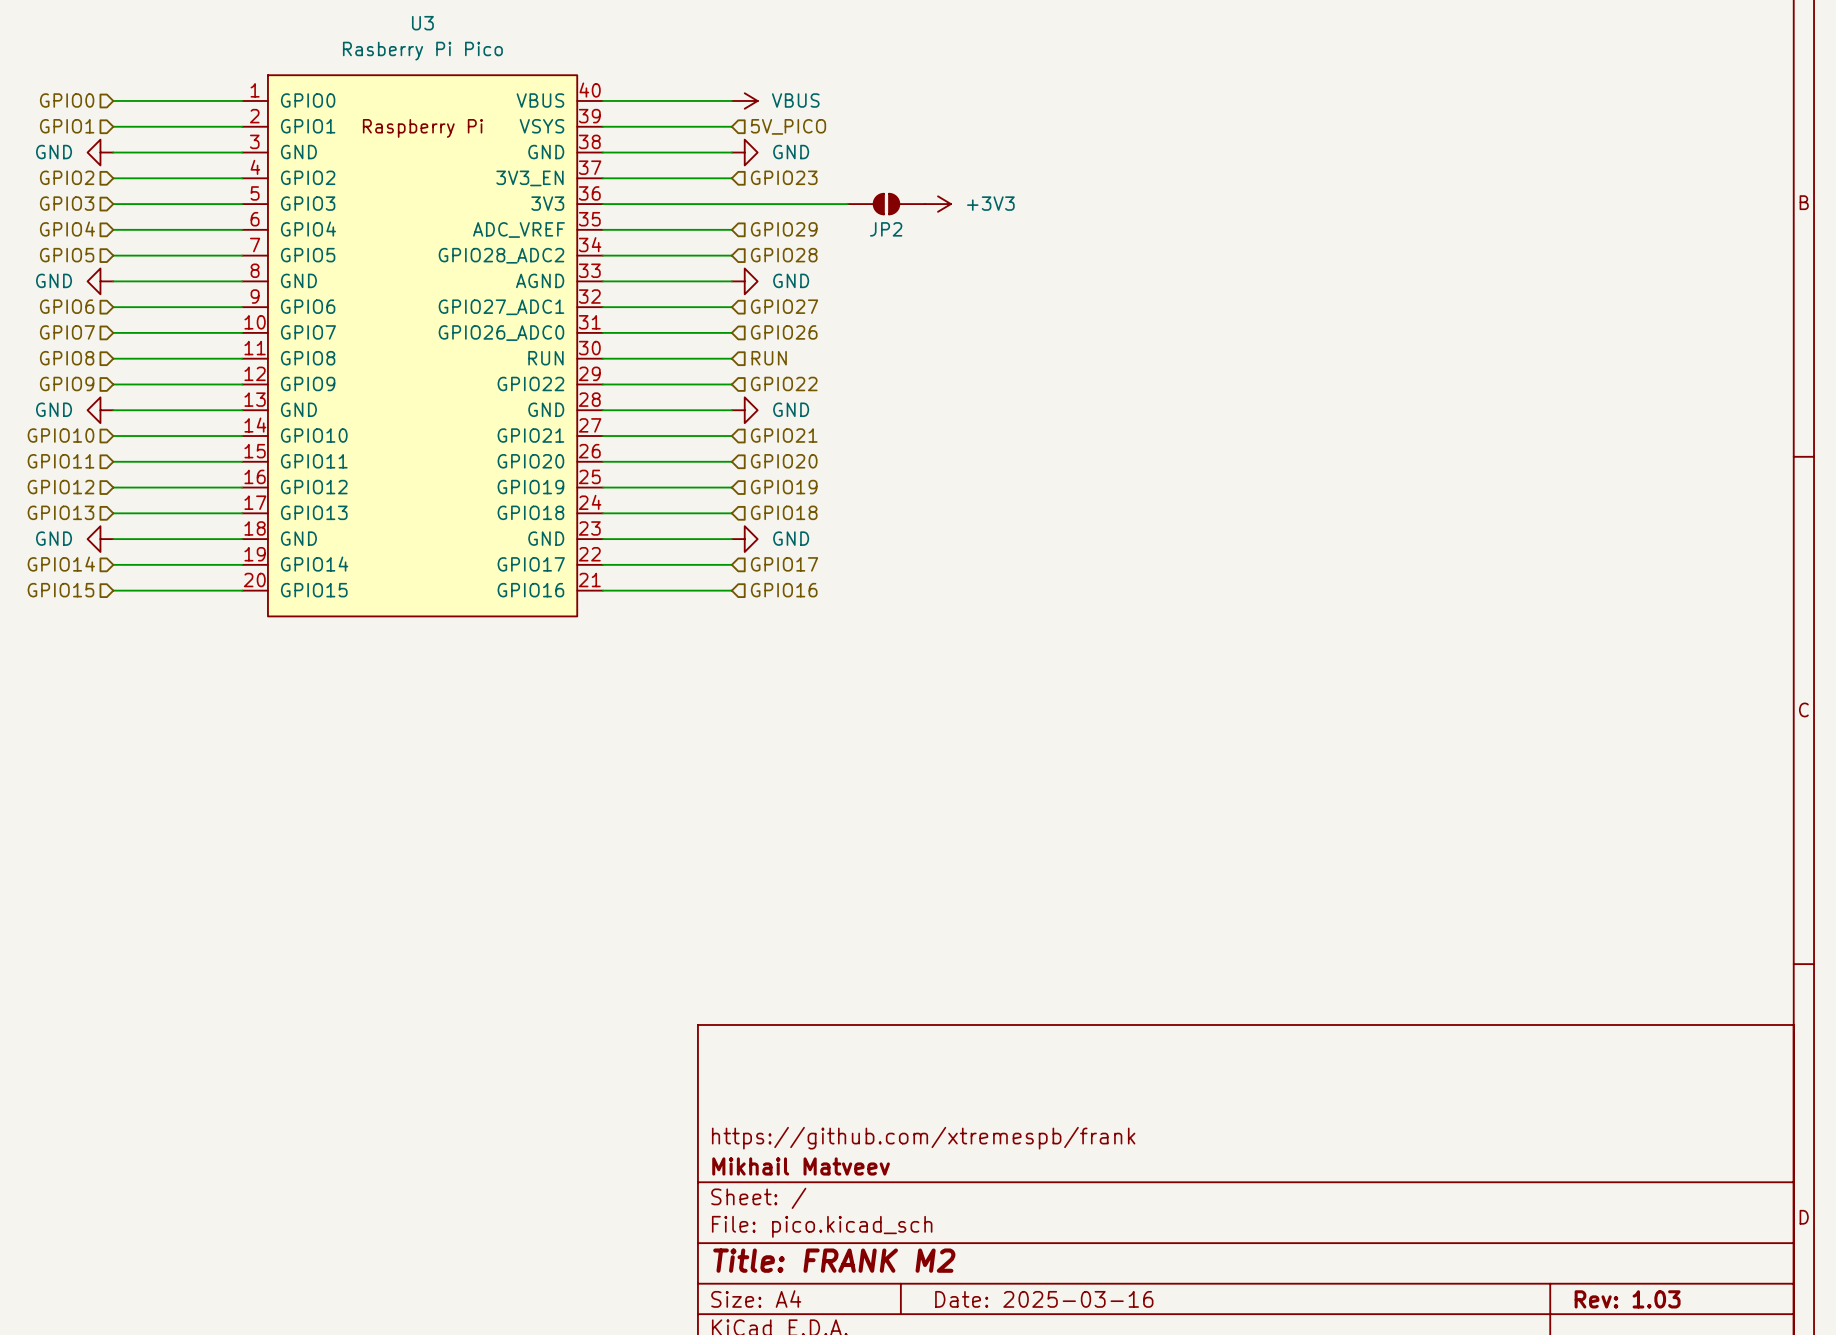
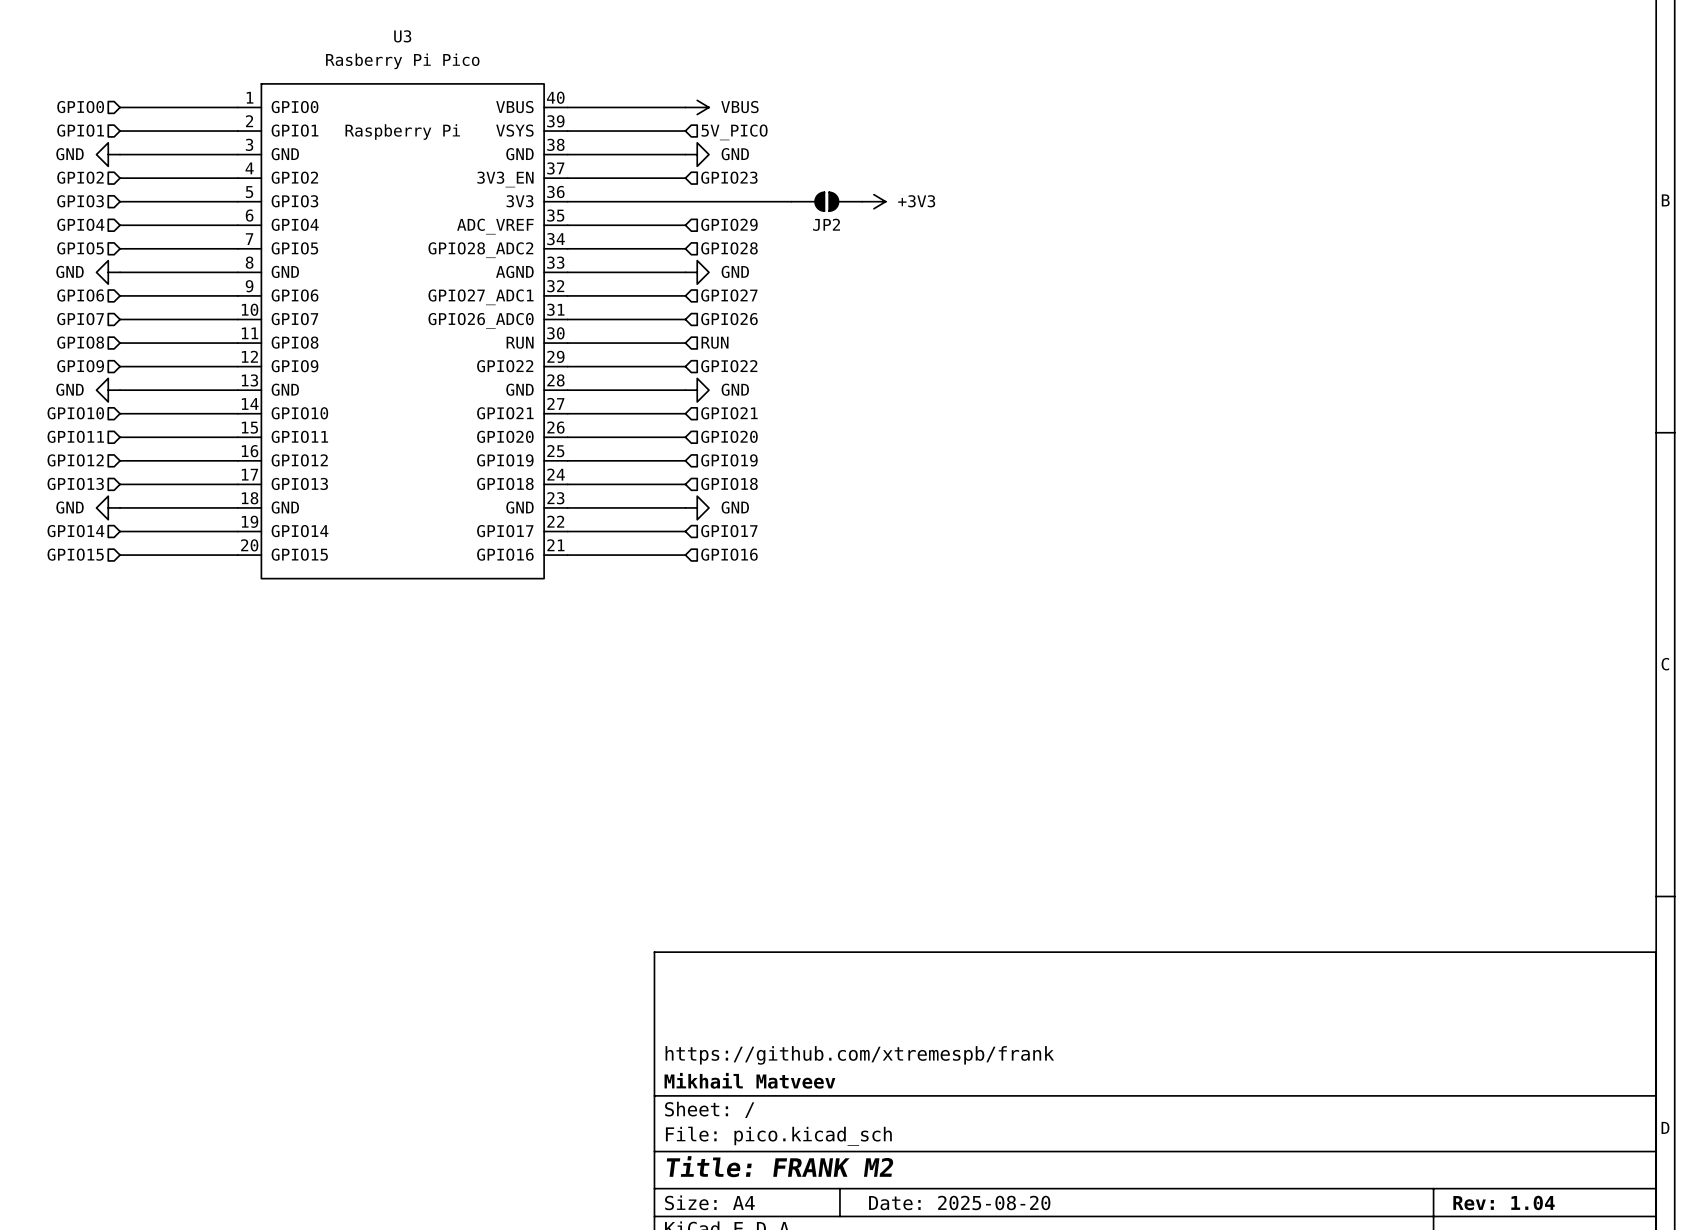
title block: Date: 2025-03-16 (1044, 1299) -> Date: 2025-08-20 (959, 1202)
title block: Rev: 1.03 (1627, 1299) -> Rev: 1.04 (1504, 1202)

